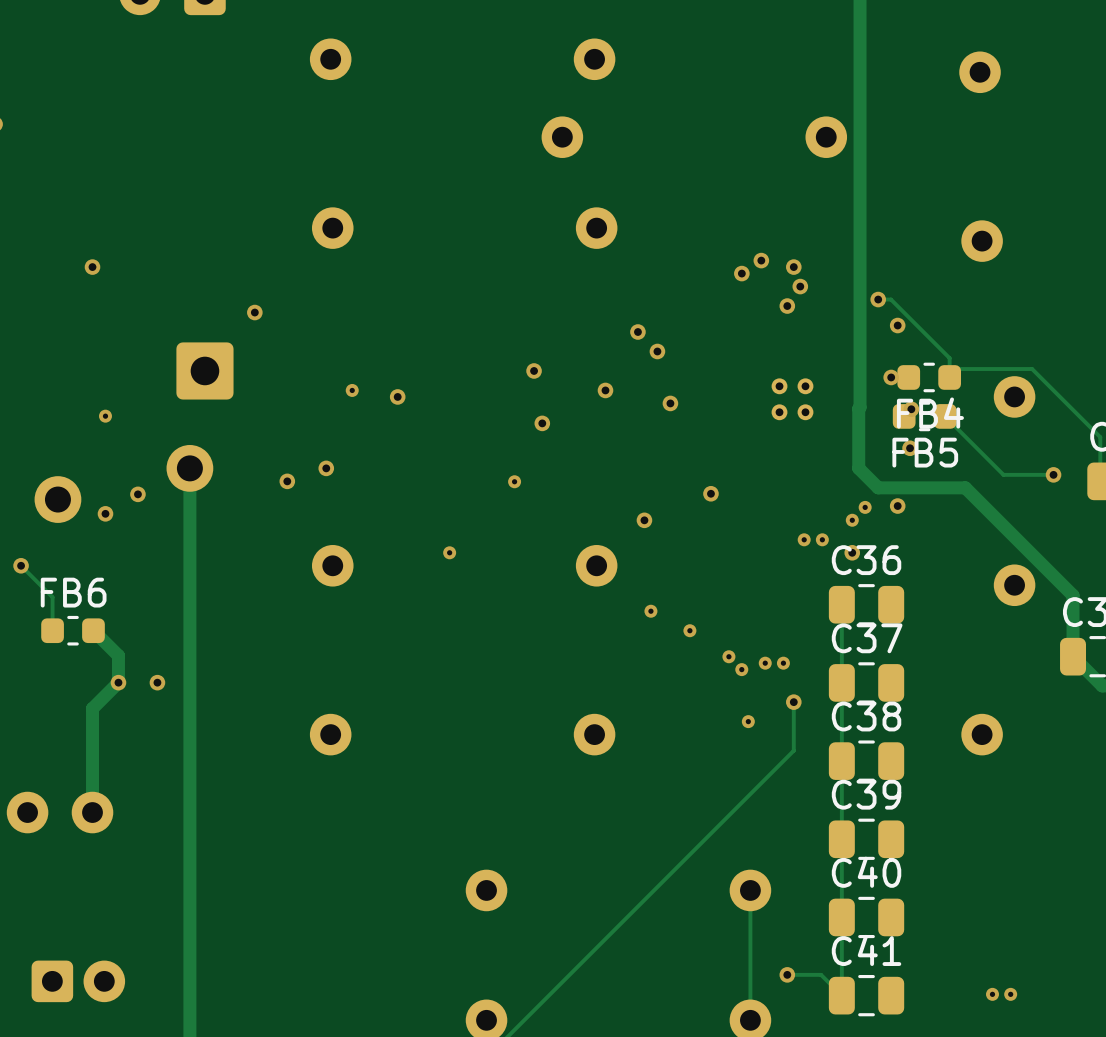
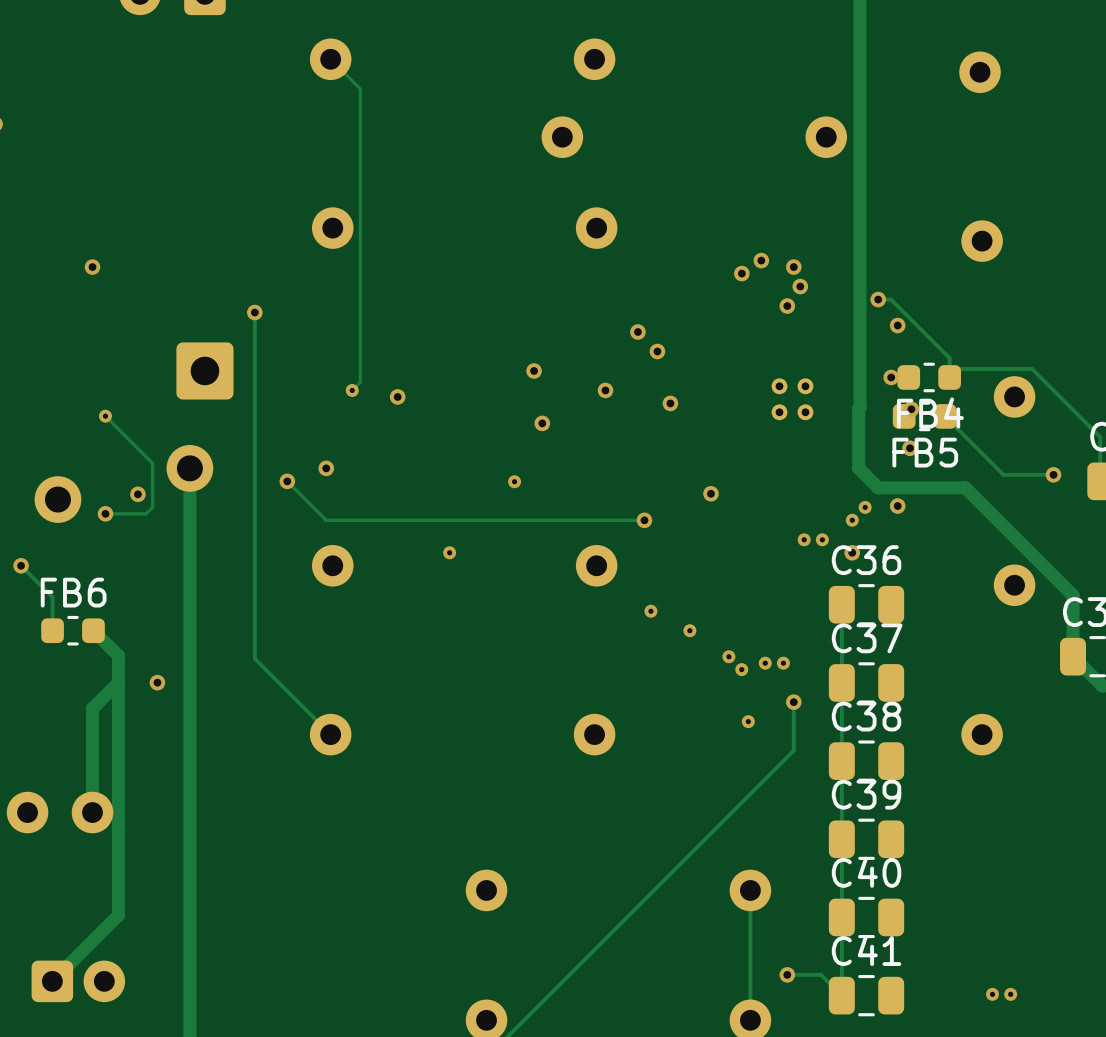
track: none -> (330, 59) (360, 88) (360, 382) (352, 390)
track: none -> (254, 312) (254, 658) (330, 734)
track: none -> (105, 416) (152, 463) (152, 507) (146, 513) (105, 513)
track: none -> (287, 481) (326, 520) (644, 520)
track: none -> (118, 682) (118, 915) (52, 981)
via: (118, 682) -> none

